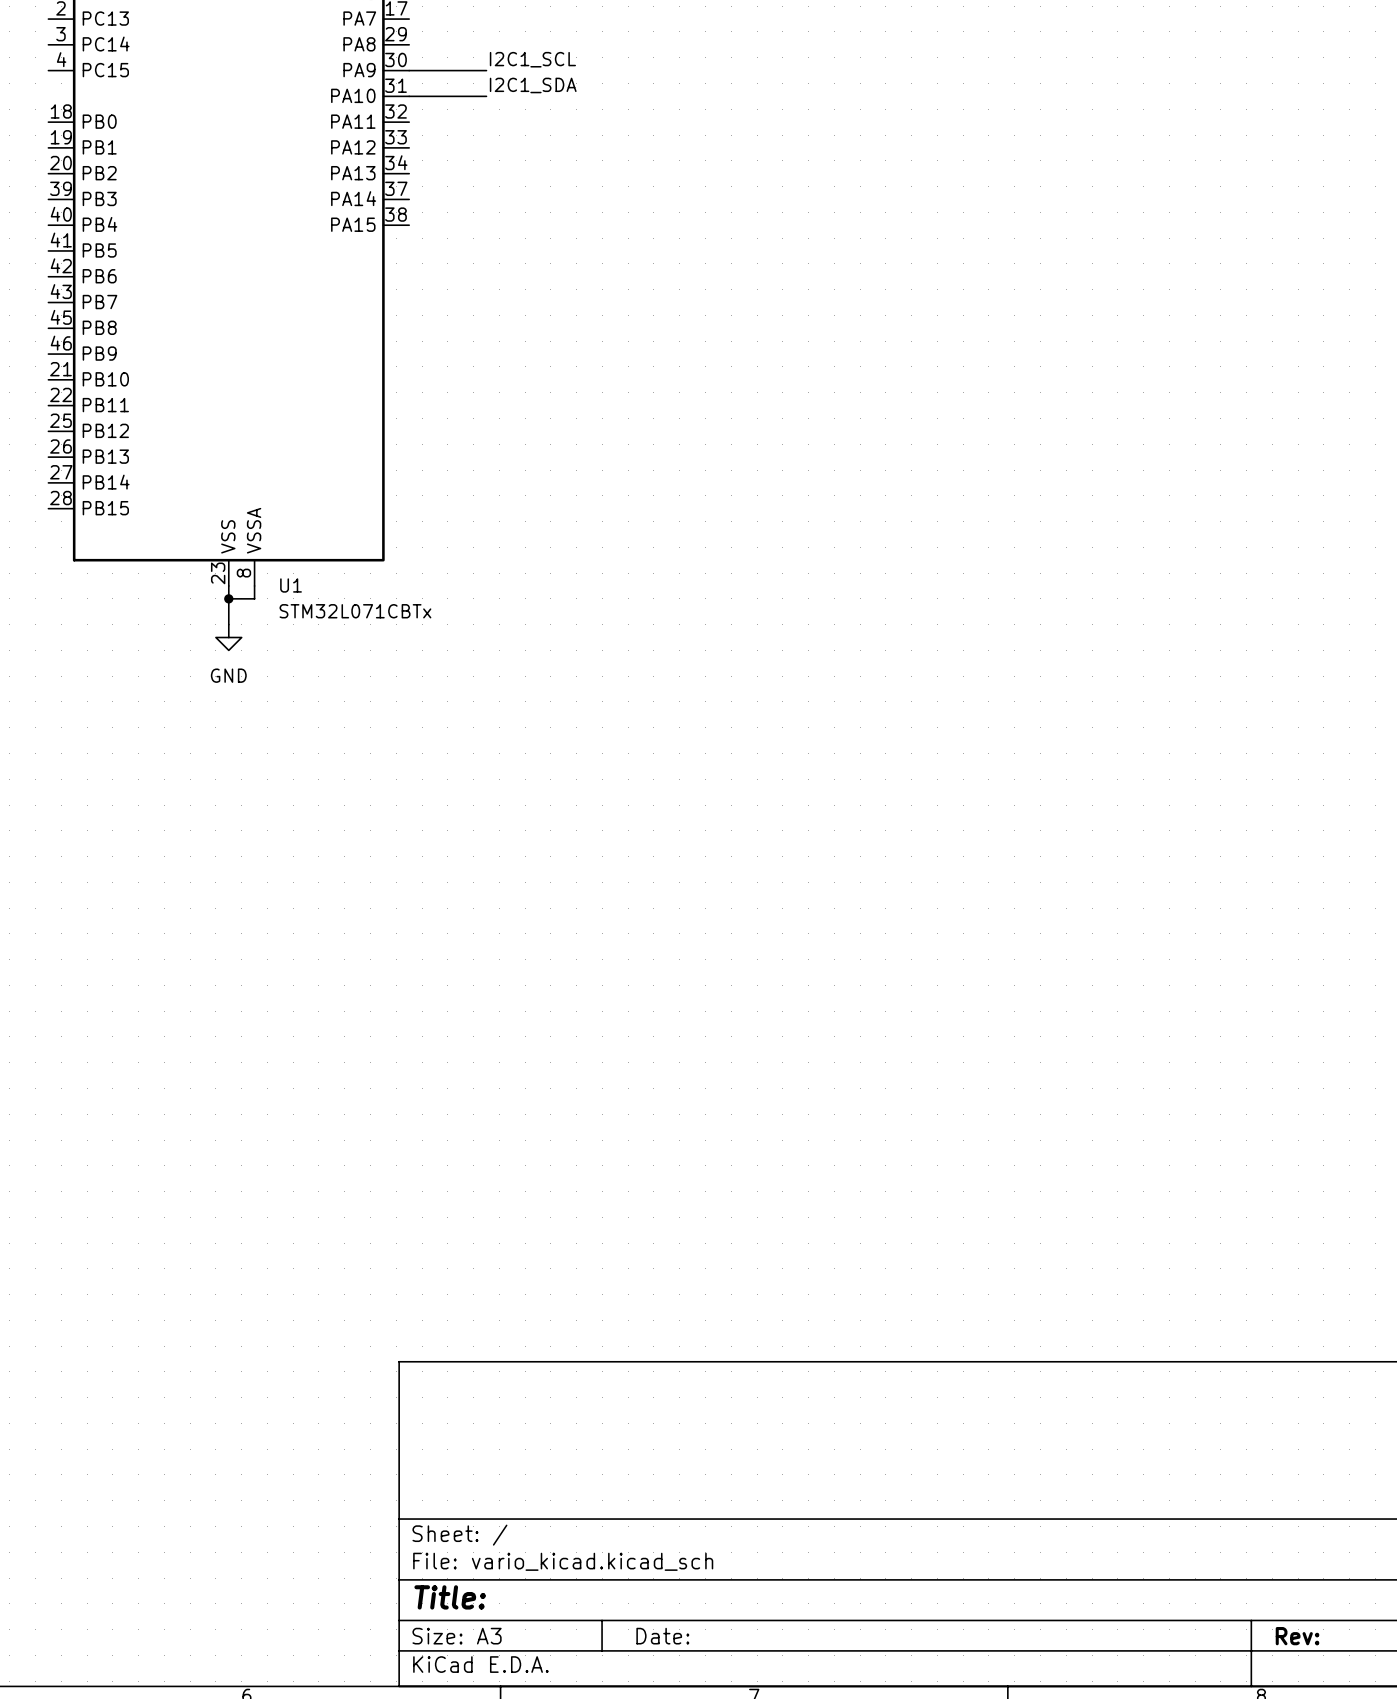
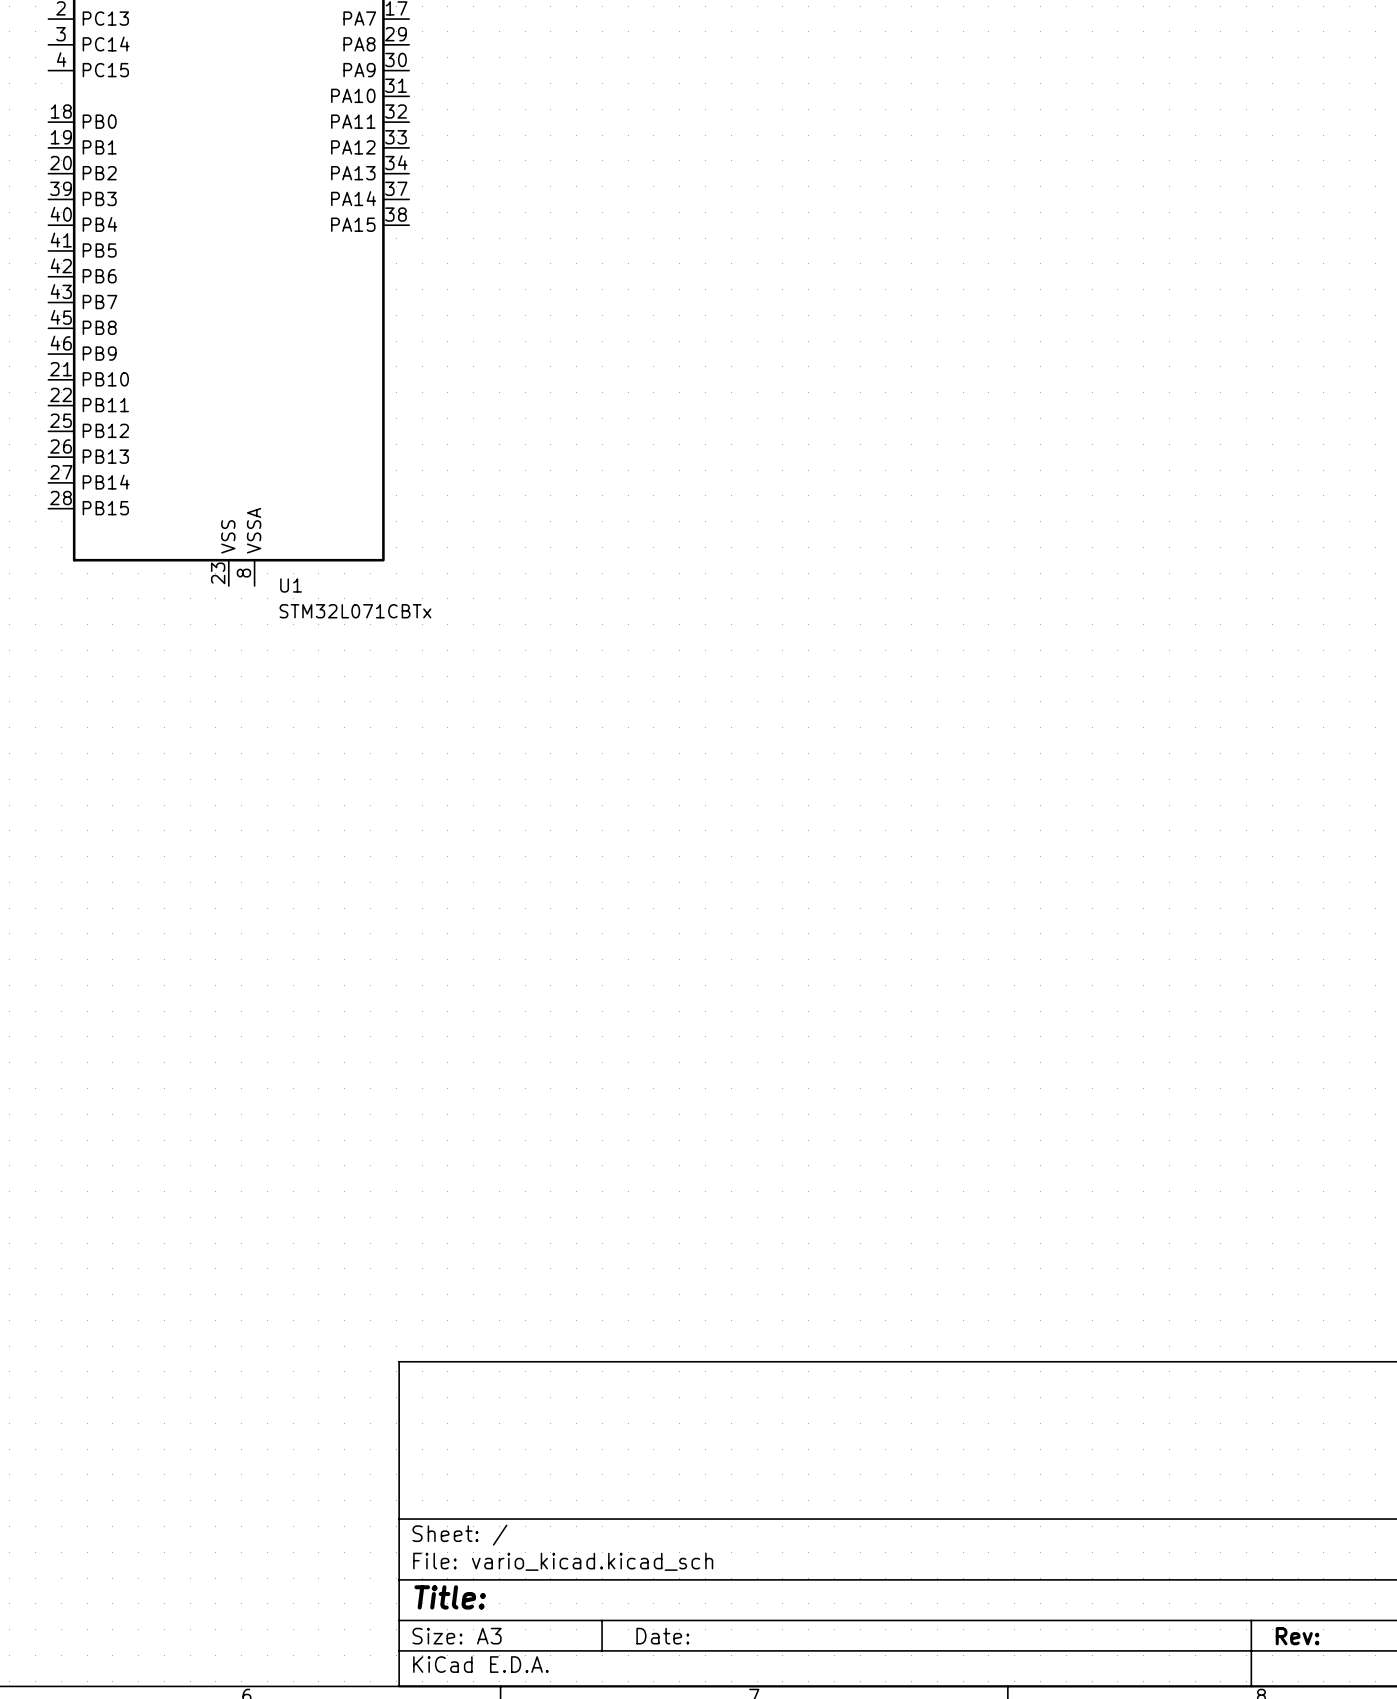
label: I2C1_SCL (532, 59) -> none
wire: (409, 70) (486, 70) -> none
label: I2C1_SDA (533, 85) -> none
wire: (409, 96) (486, 96) -> none
wire: (228, 585) (228, 624) -> none
wire: (254, 585) (254, 598) (228, 598) -> none
junction: (228, 598) -> none
power symbol: GND (228, 637) -> none

